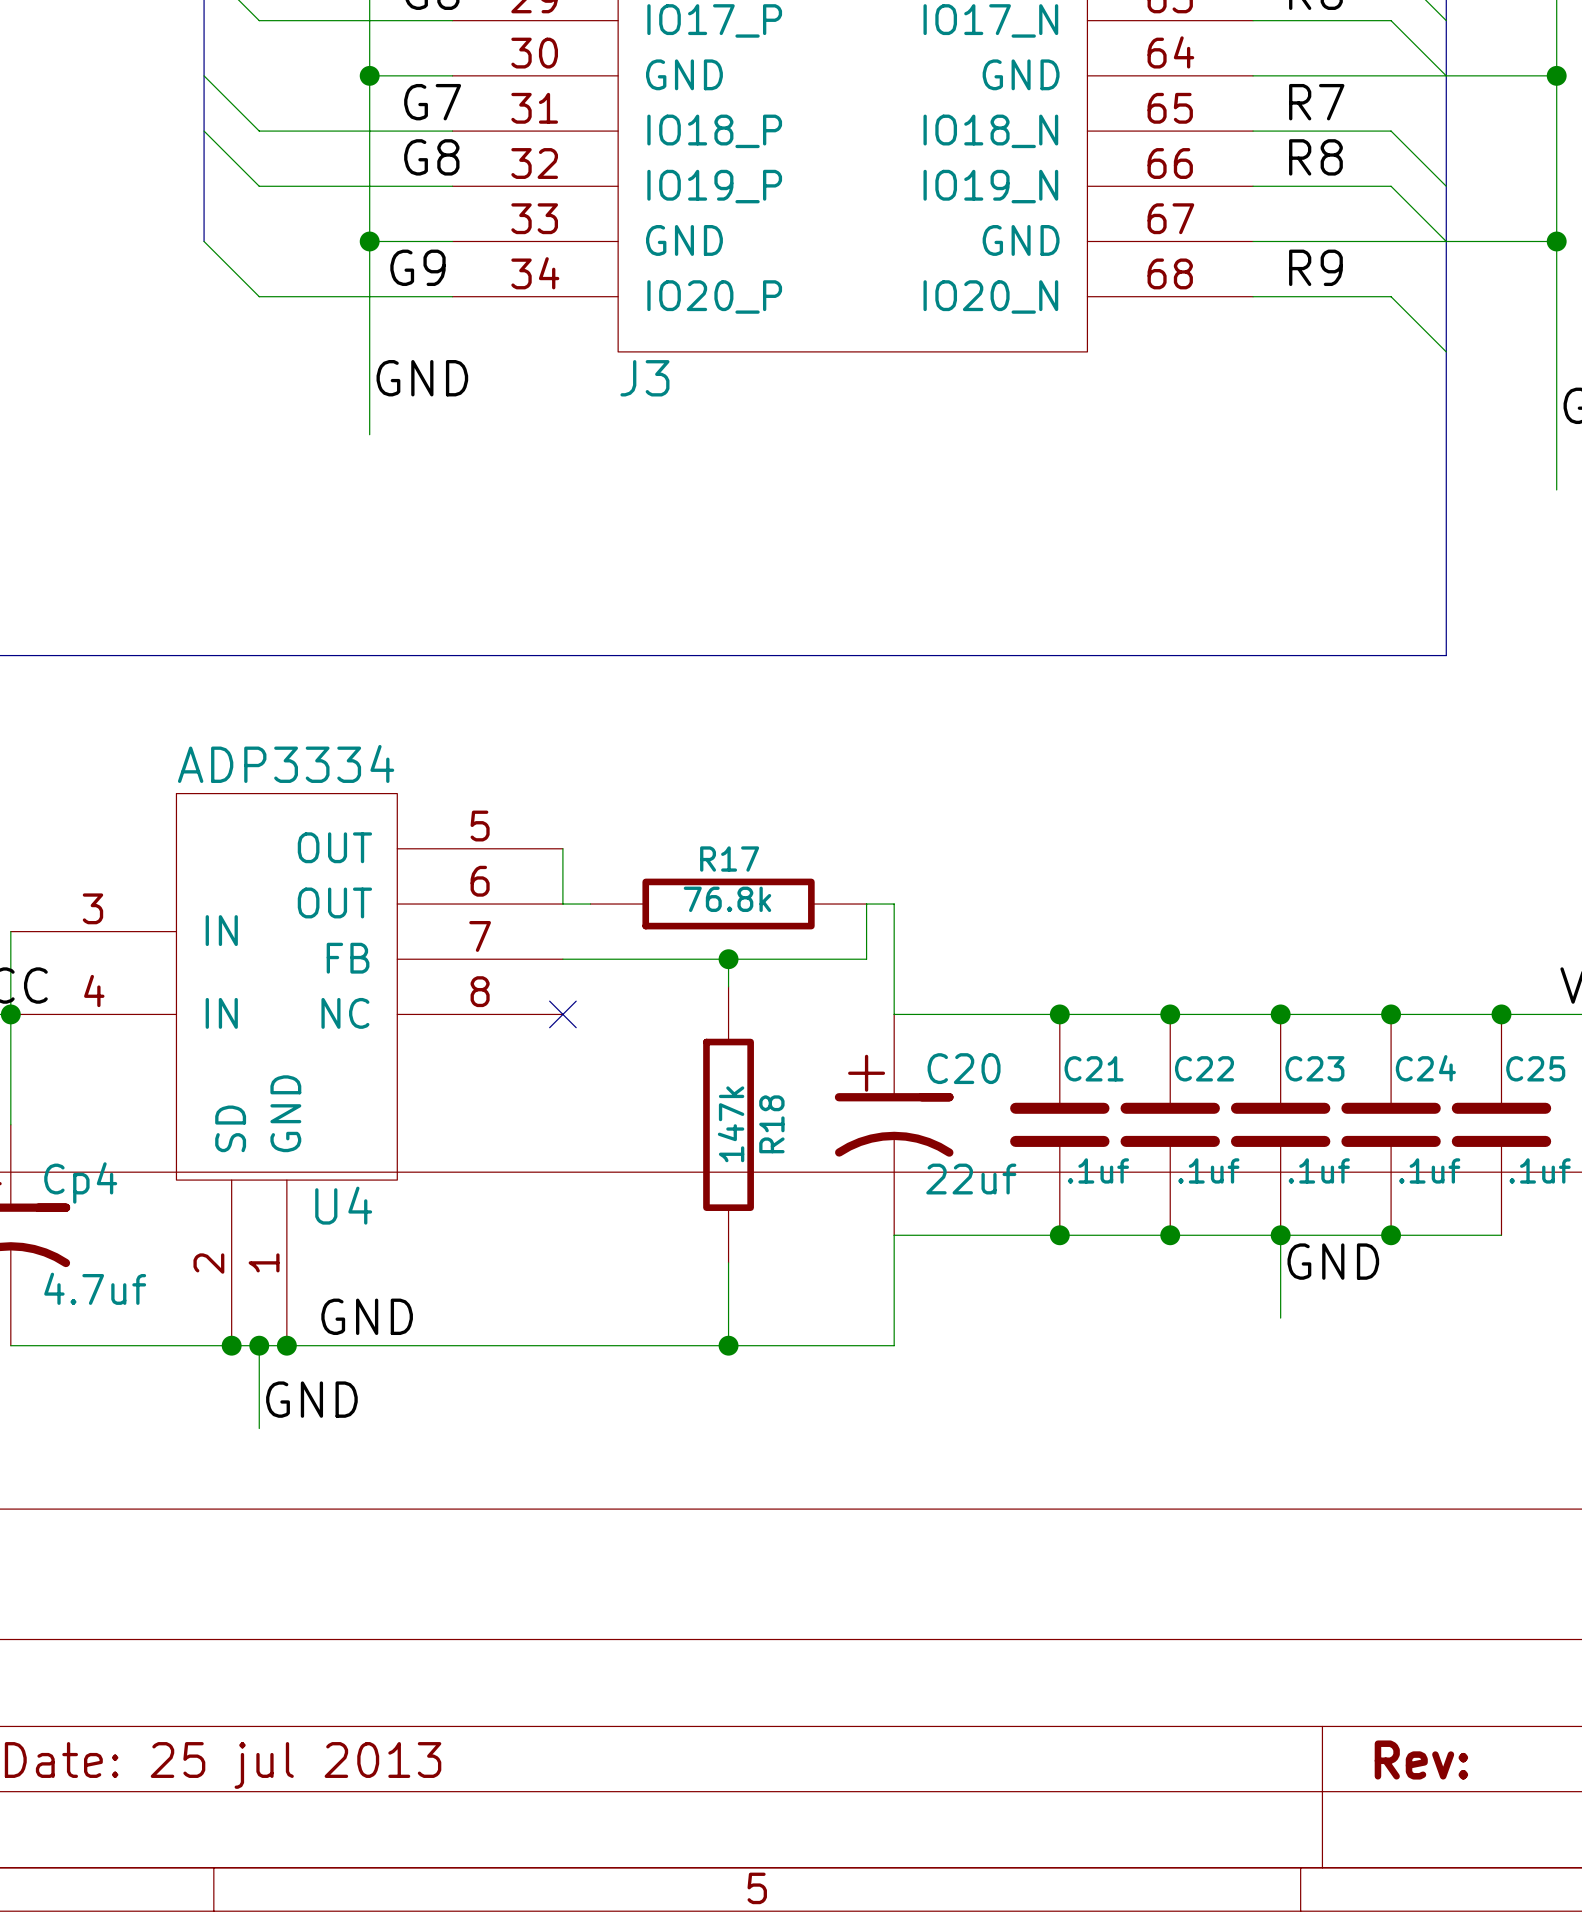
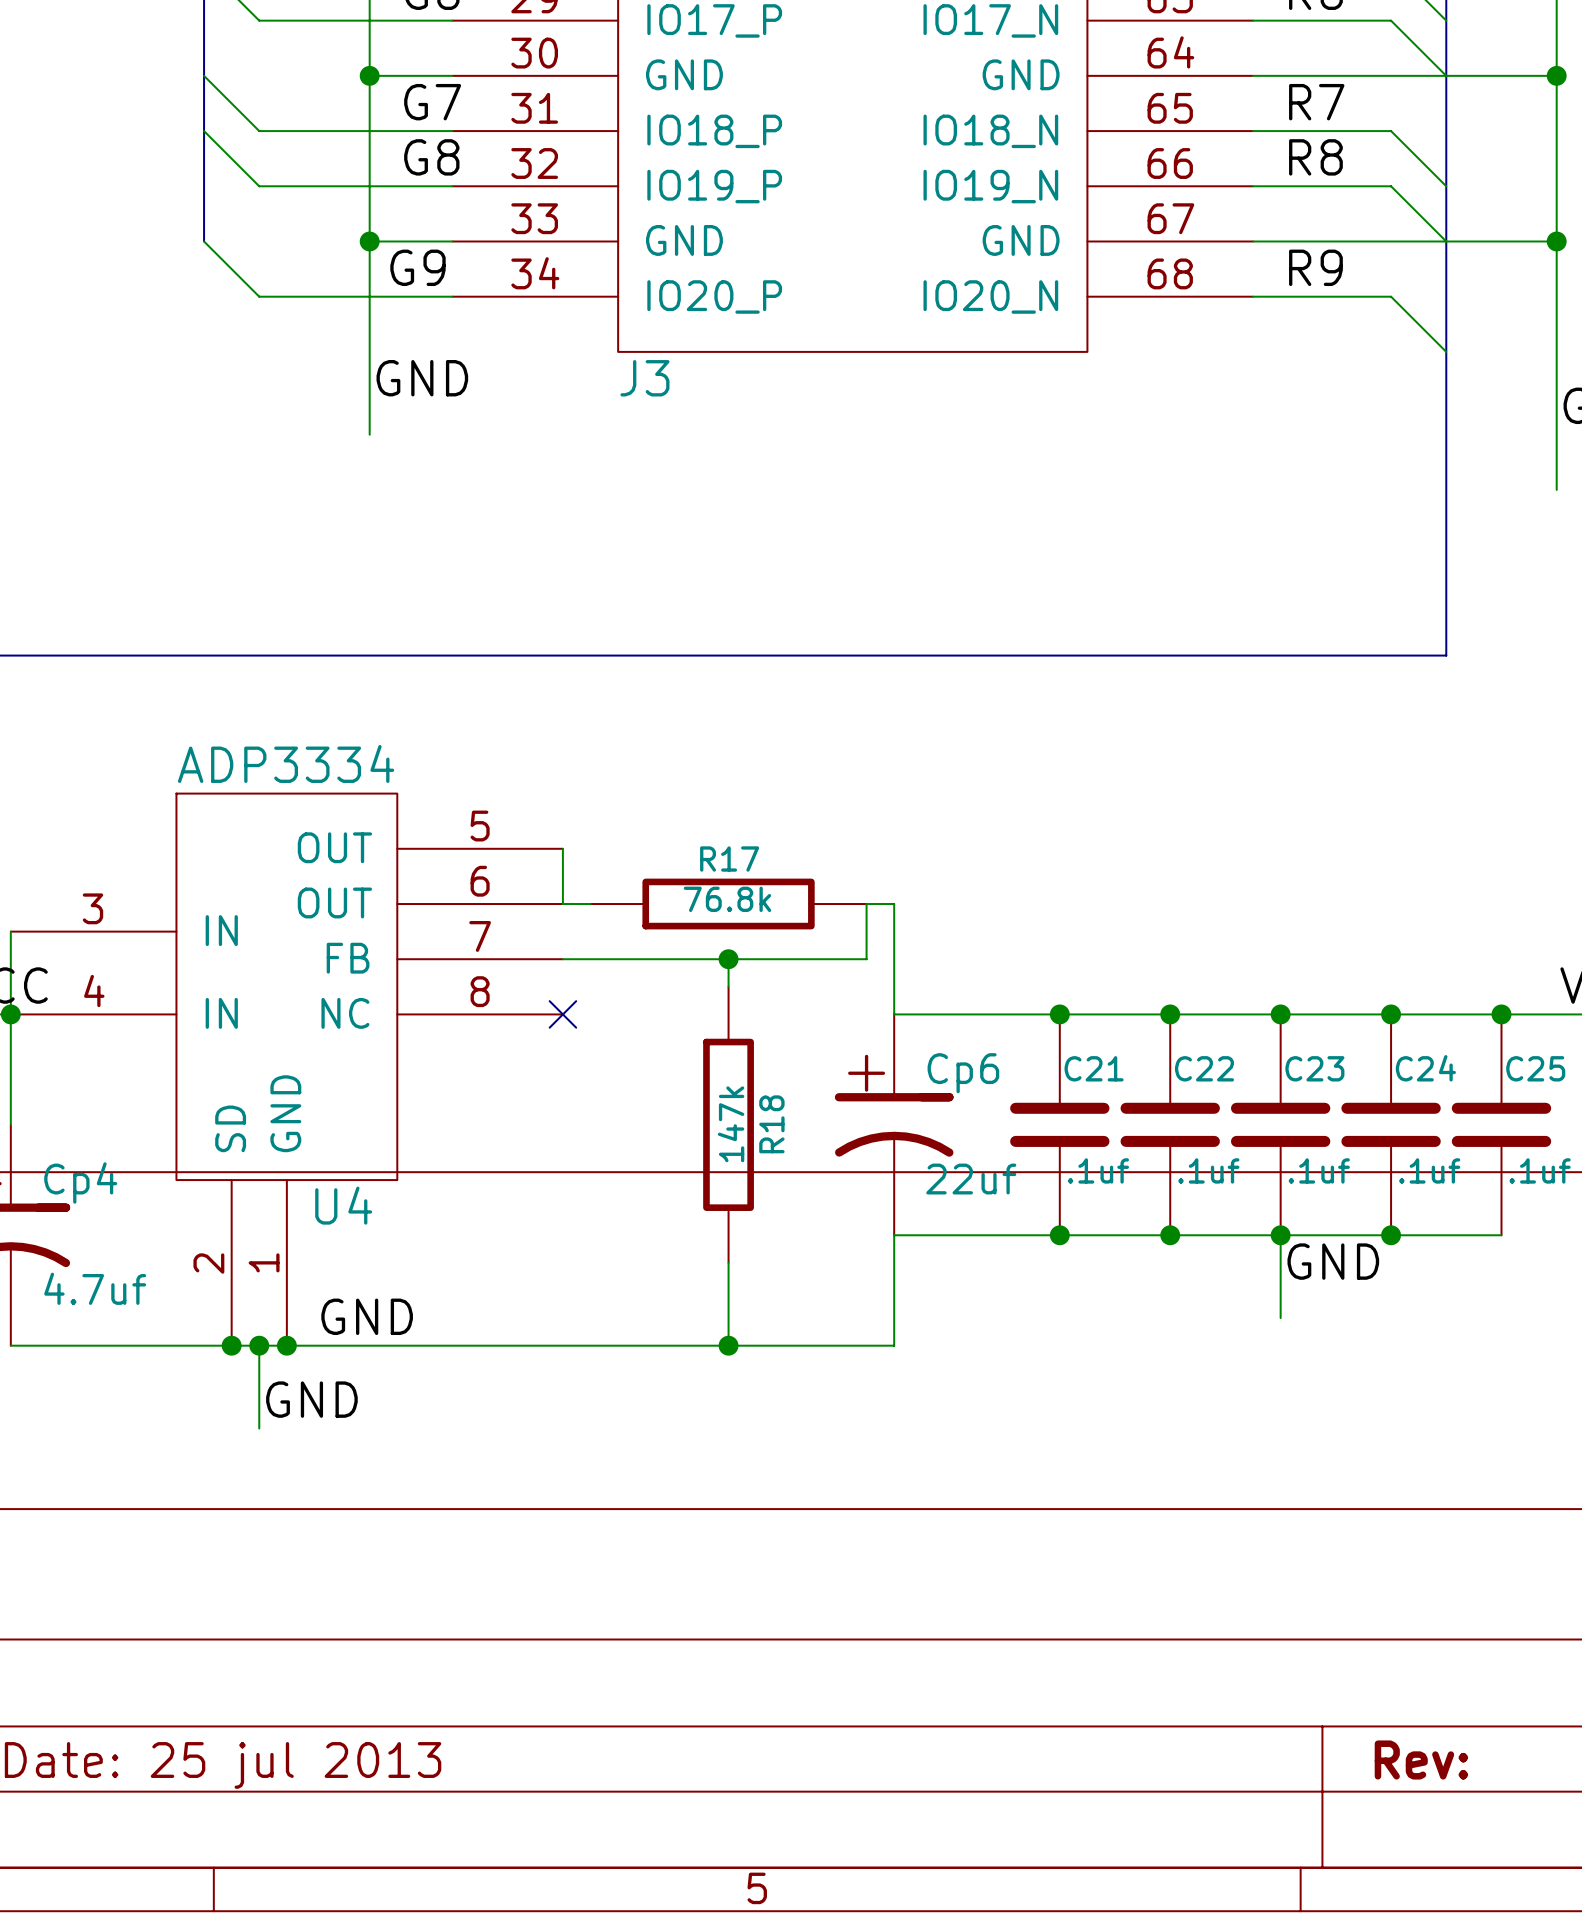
C20 name: C20 (964, 1068) -> Cp6 (963, 1073)

